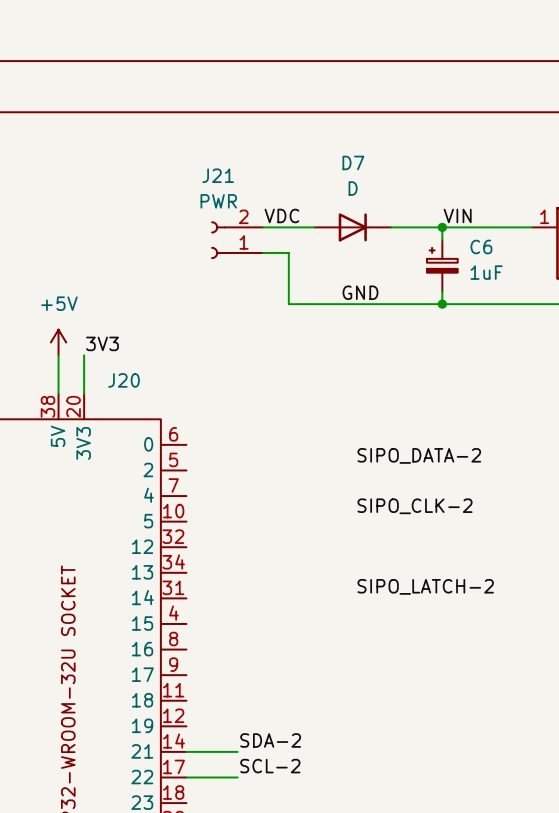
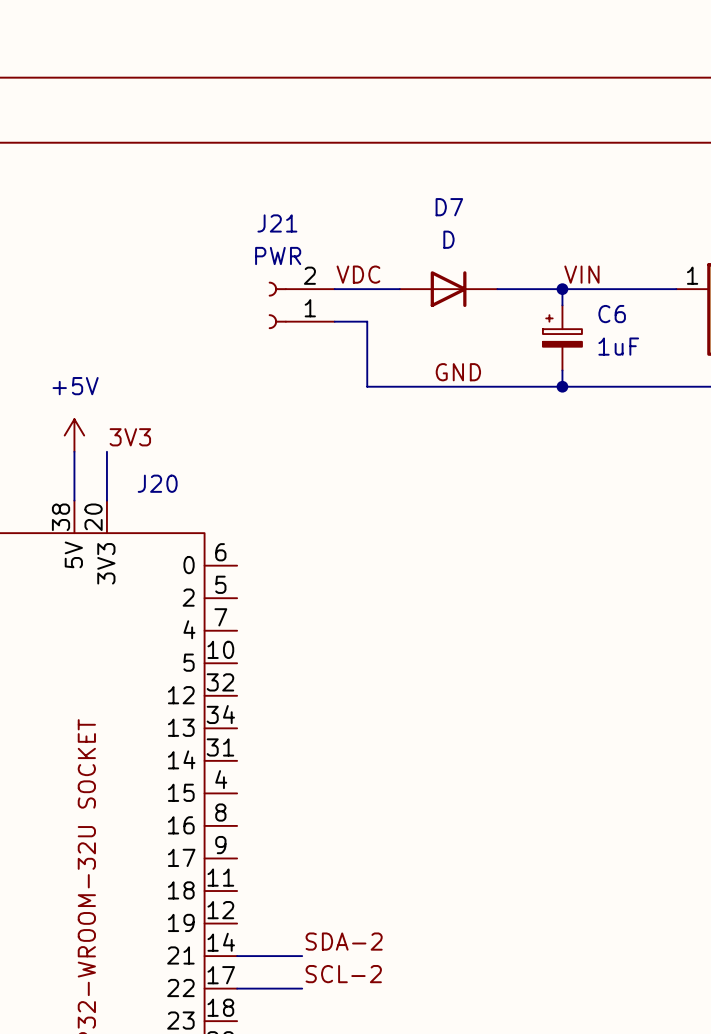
label: SIPO_DATA-2 (419, 455) -> none
label: SIPO_CLK-2 (415, 506) -> none
label: SIPO_LATCH-2 (425, 586) -> none

